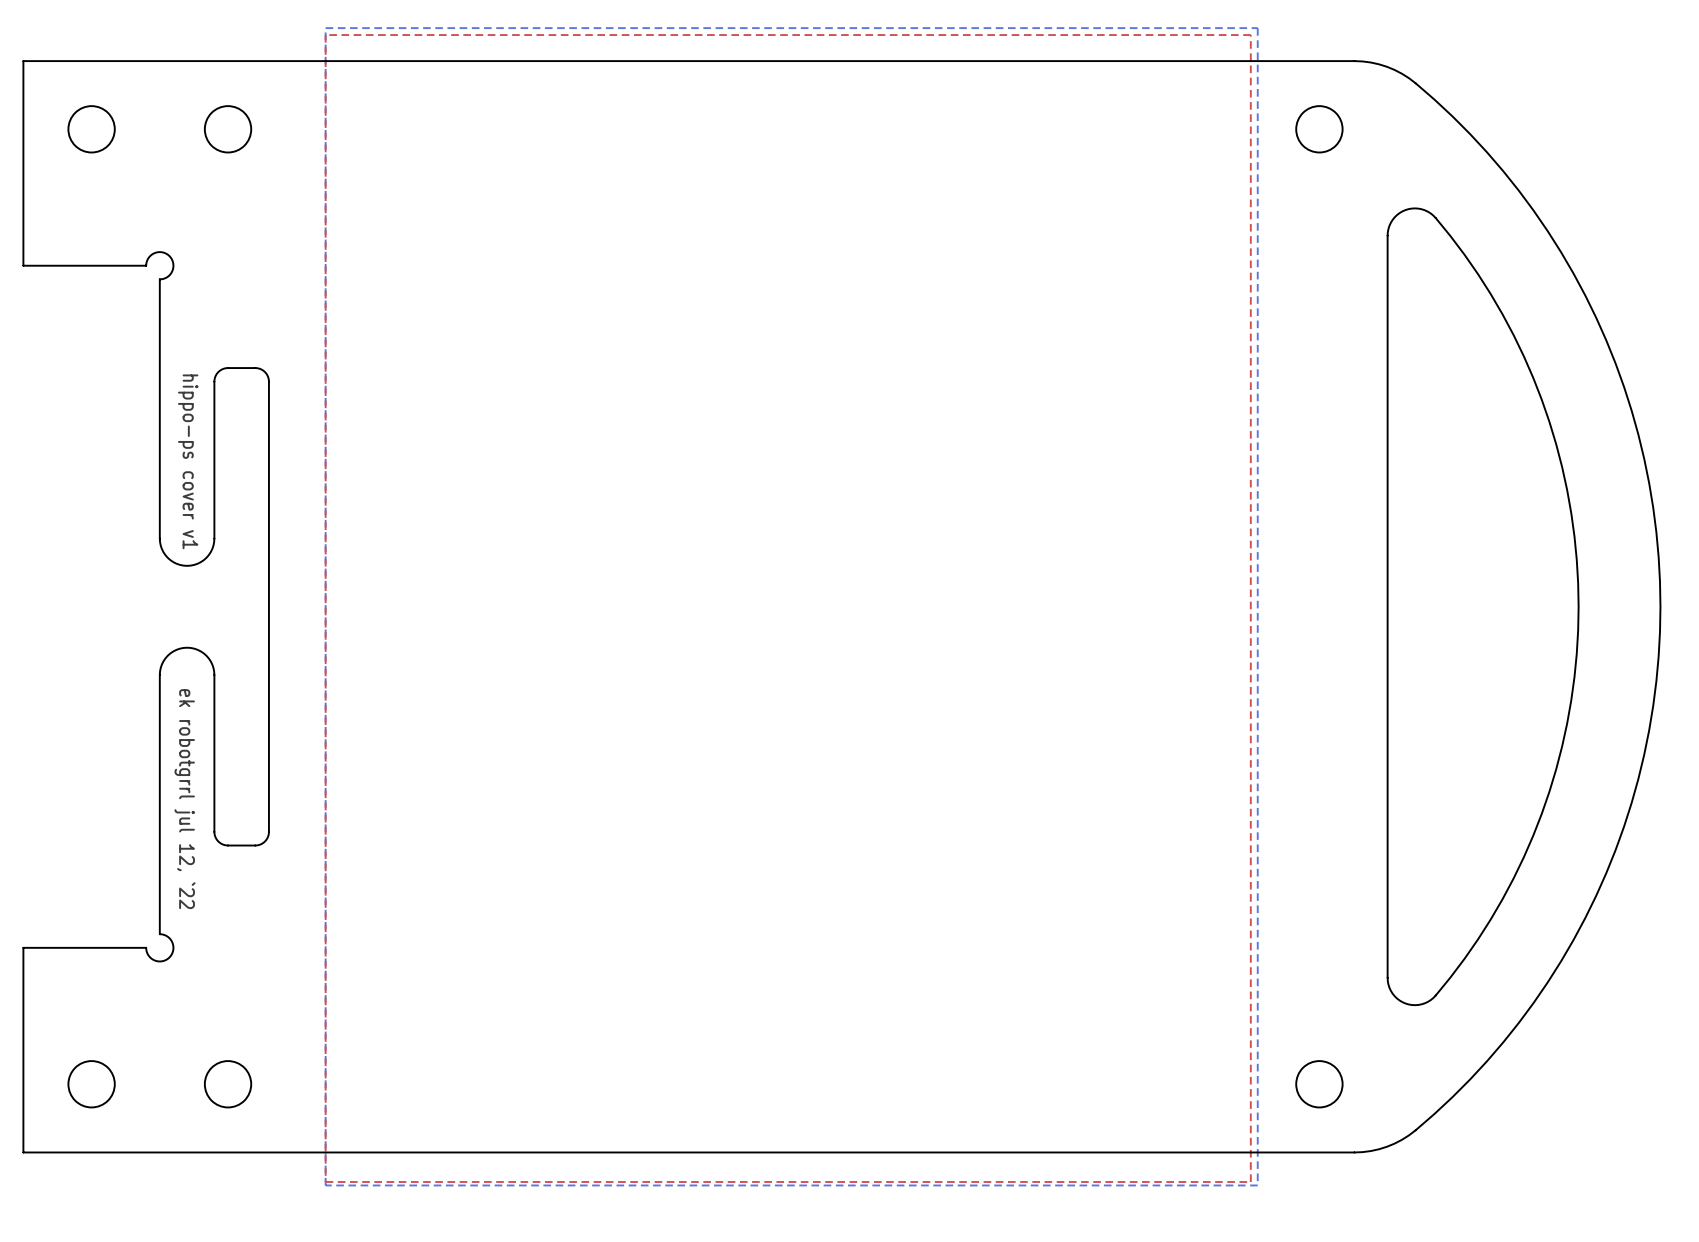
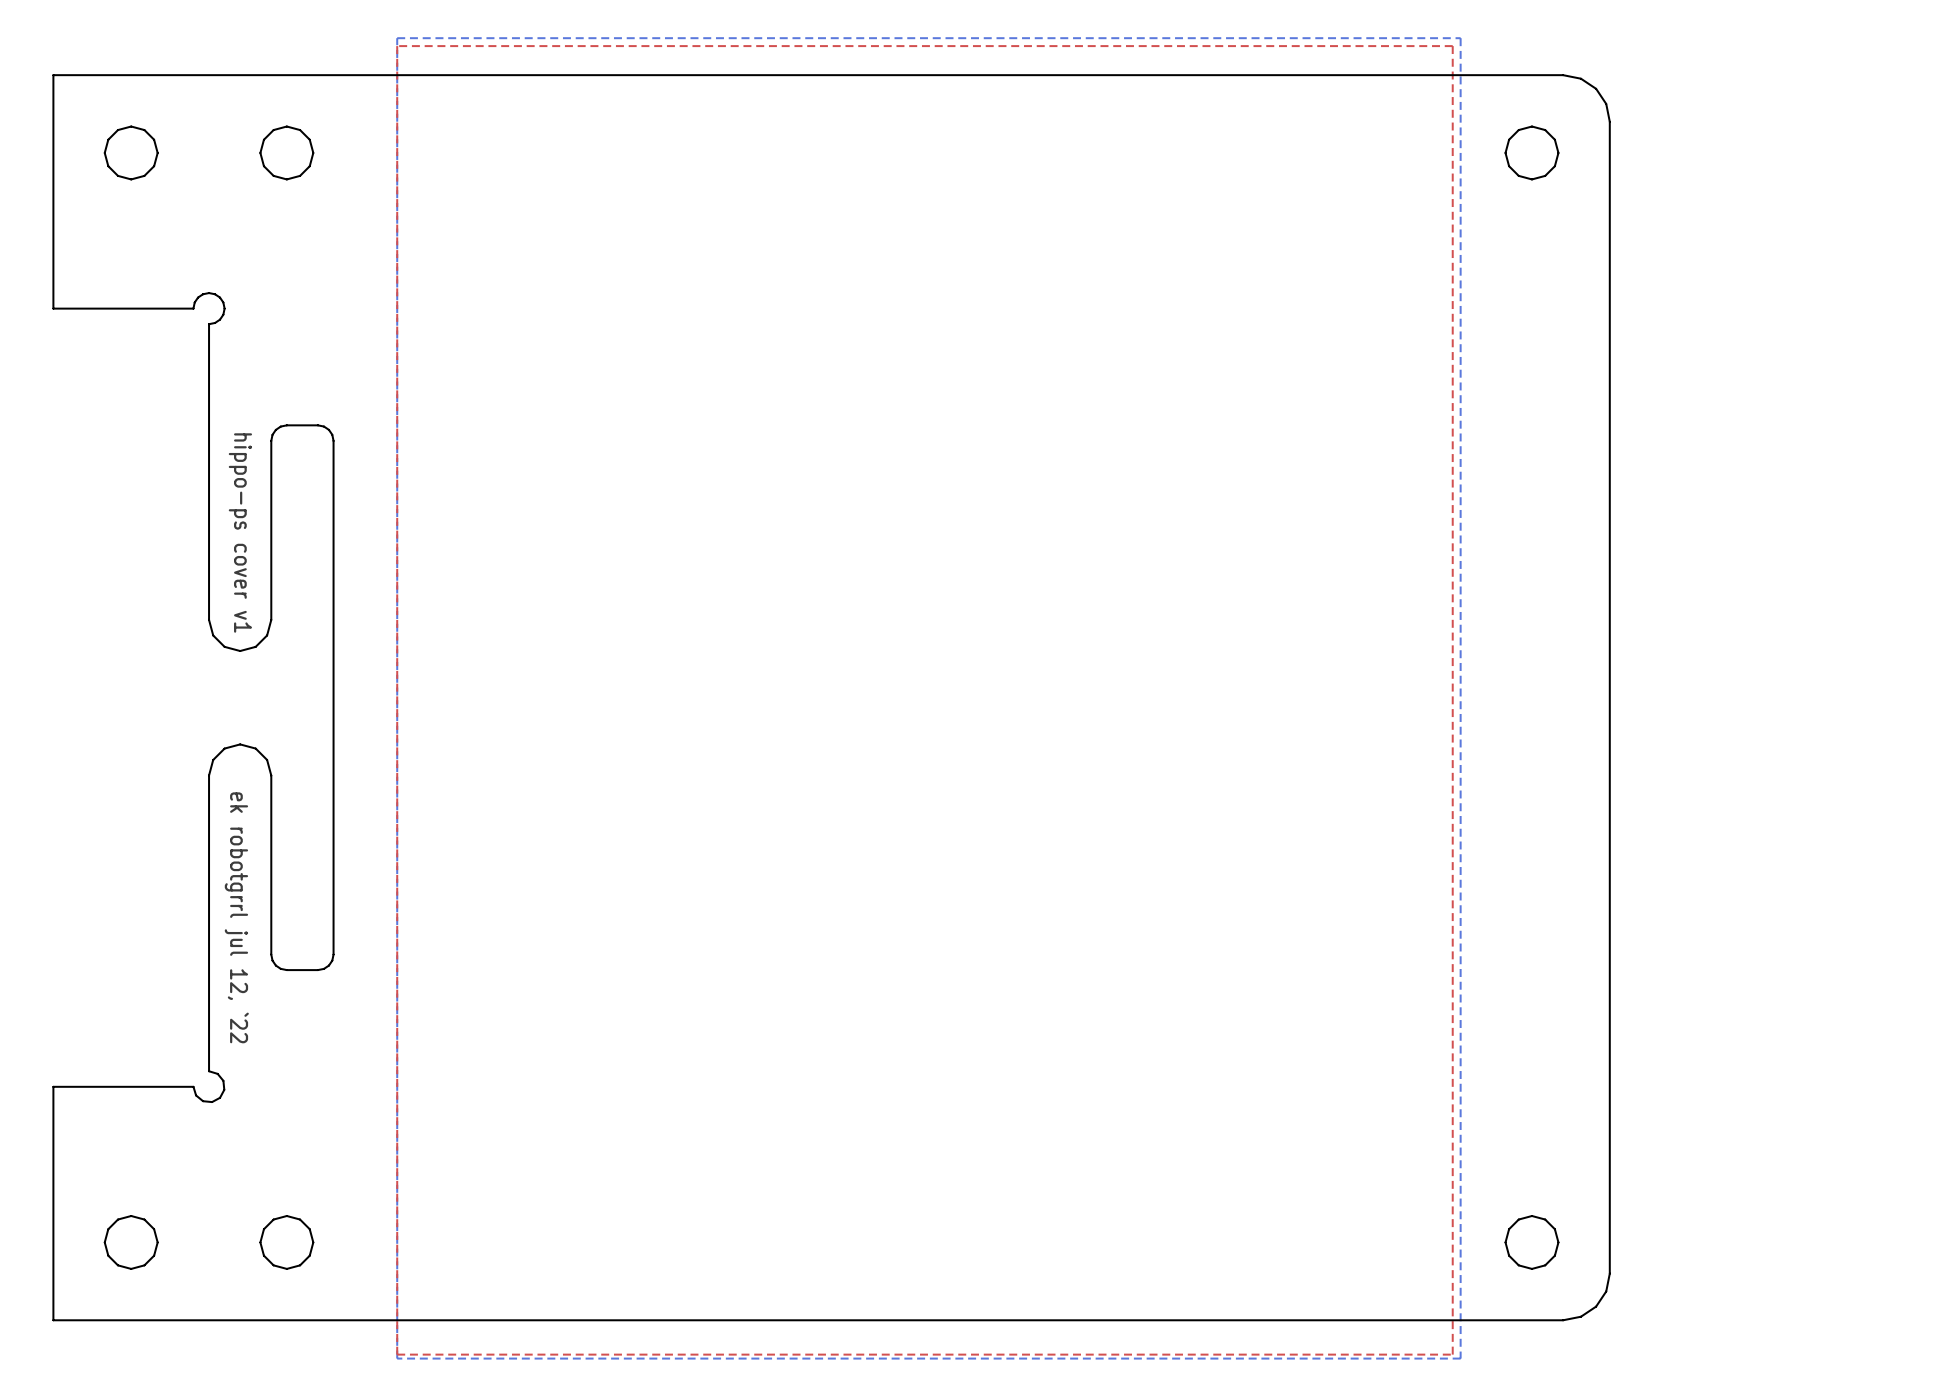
board edge: (23, 61) (23, 265) (146, 265) (150, 256) (159, 252) (168, 254) (173, 262) (170, 274) (159, 279) (159, 538) (163, 552) (173, 562) (183, 565) (197, 563) (208, 555) (213, 545) (214, 381) (216, 374) (226, 368) (257, 368) (266, 373) (268, 381) (268, 835) (263, 842) (255, 845) (226, 845) (216, 838) (214, 831) (213, 667) (208, 658) (197, 649) (183, 647) (173, 651) (163, 661) (159, 674) (159, 934) (170, 939) (173, 951) (168, 958) (159, 961) (150, 957) (146, 947) (23, 947) (23, 1152) (1370, 1151) (1387, 1146) (1409, 1135) (1470, 1079) (1518, 1022) (1547, 982) (1573, 939) (1606, 873) (1624, 826) (1638, 778) (1649, 730) (1658, 656) (1660, 606) (1658, 557) (1649, 483) (1631, 410) (1615, 363) (1585, 295) (1561, 252) (1518, 190) (1487, 152) (1434, 99) (1402, 73) (1379, 64) (1354, 61) (23, 61) -> (53, 75) (53, 308) (193, 308) (198, 297) (209, 293) (215, 294) (223, 302) (223, 314) (215, 322) (209, 324) (209, 619) (213, 635) (224, 646) (240, 651) (255, 646) (267, 635) (271, 619) (272, 434) (280, 426) (317, 425) (328, 429) (333, 440) (332, 960) (324, 968) (317, 970) (280, 968) (272, 960) (271, 775) (267, 759) (255, 748) (240, 744) (224, 748) (213, 759) (209, 775) (209, 1071) (217, 1073) (223, 1080) (224, 1089) (220, 1097) (212, 1102) (203, 1101) (196, 1095) (193, 1086) (53, 1086) (53, 1320) (1563, 1320) (1580, 1316) (1596, 1306) (1606, 1291) (1609, 1273) (1609, 121) (1606, 103) (1596, 88) (1580, 78) (1563, 75) (53, 75)
board edge: none -> (131, 126) (117, 130) (108, 139) (104, 152) (108, 166) (117, 175) (131, 179) (144, 175) (154, 166) (157, 152) (154, 139) (144, 130) (131, 126)
board edge: none -> (286, 126) (273, 130) (263, 139) (260, 152) (263, 166) (273, 175) (286, 179) (300, 175) (309, 166) (313, 152) (309, 139) (300, 130) (286, 126)
board edge: none -> (1531, 126) (1518, 130) (1509, 139) (1505, 152) (1509, 166) (1518, 175) (1531, 179) (1545, 175) (1554, 166) (1558, 152) (1554, 139) (1545, 130) (1531, 126)
round board edge: [68, 106, 115, 153] -> none
round board edge: [204, 106, 252, 153] -> none
round board edge: [1296, 106, 1343, 153] -> none
board edge: (1435, 218) (1478, 274) (1502, 314) (1523, 356) (1549, 421) (1567, 490) (1574, 536) (1578, 583) (1578, 630) (1574, 677) (1567, 723) (1549, 791) (1533, 835) (1502, 899) (1464, 958) (1433, 997) (1425, 1003) (1415, 1005) (1405, 1003) (1396, 998) (1390, 990) (1387, 977) (1387, 235) (1392, 220) (1405, 210) (1421, 209) (1435, 218) -> none
board edge: none -> (131, 1216) (117, 1219) (108, 1229) (104, 1242) (108, 1255) (117, 1265) (131, 1268) (144, 1265) (154, 1255) (157, 1242) (154, 1229) (144, 1219) (131, 1216)
board edge: none -> (286, 1216) (273, 1219) (263, 1229) (260, 1242) (263, 1255) (273, 1265) (286, 1268) (300, 1265) (309, 1255) (313, 1242) (309, 1229) (300, 1219) (286, 1216)
board edge: none -> (1531, 1216) (1518, 1219) (1509, 1229) (1505, 1242) (1509, 1255) (1518, 1265) (1531, 1268) (1545, 1265) (1554, 1255) (1558, 1242) (1554, 1229) (1545, 1219) (1531, 1216)
round board edge: [68, 1061, 115, 1108] -> none
round board edge: [204, 1061, 252, 1108] -> none
round board edge: [1296, 1061, 1343, 1108] -> none

